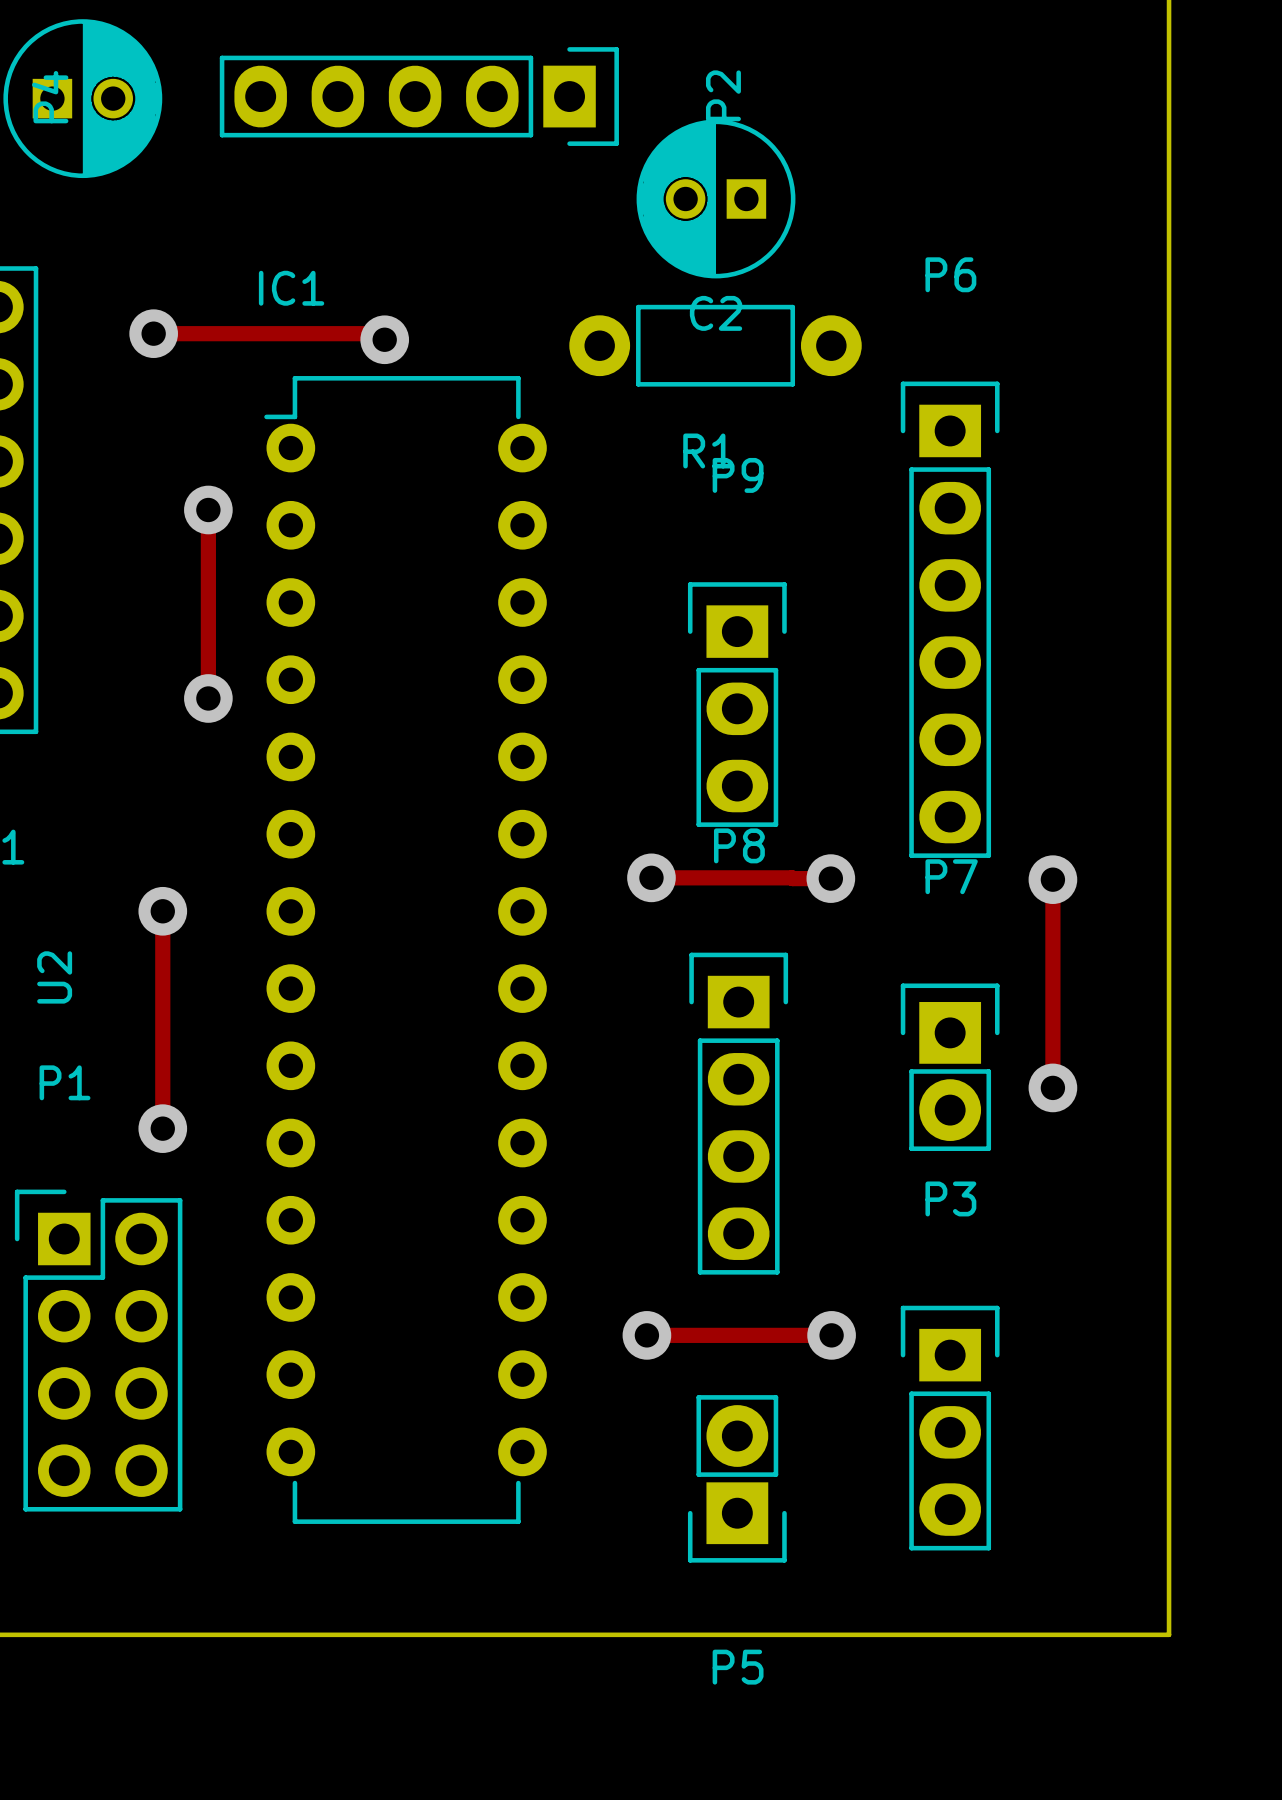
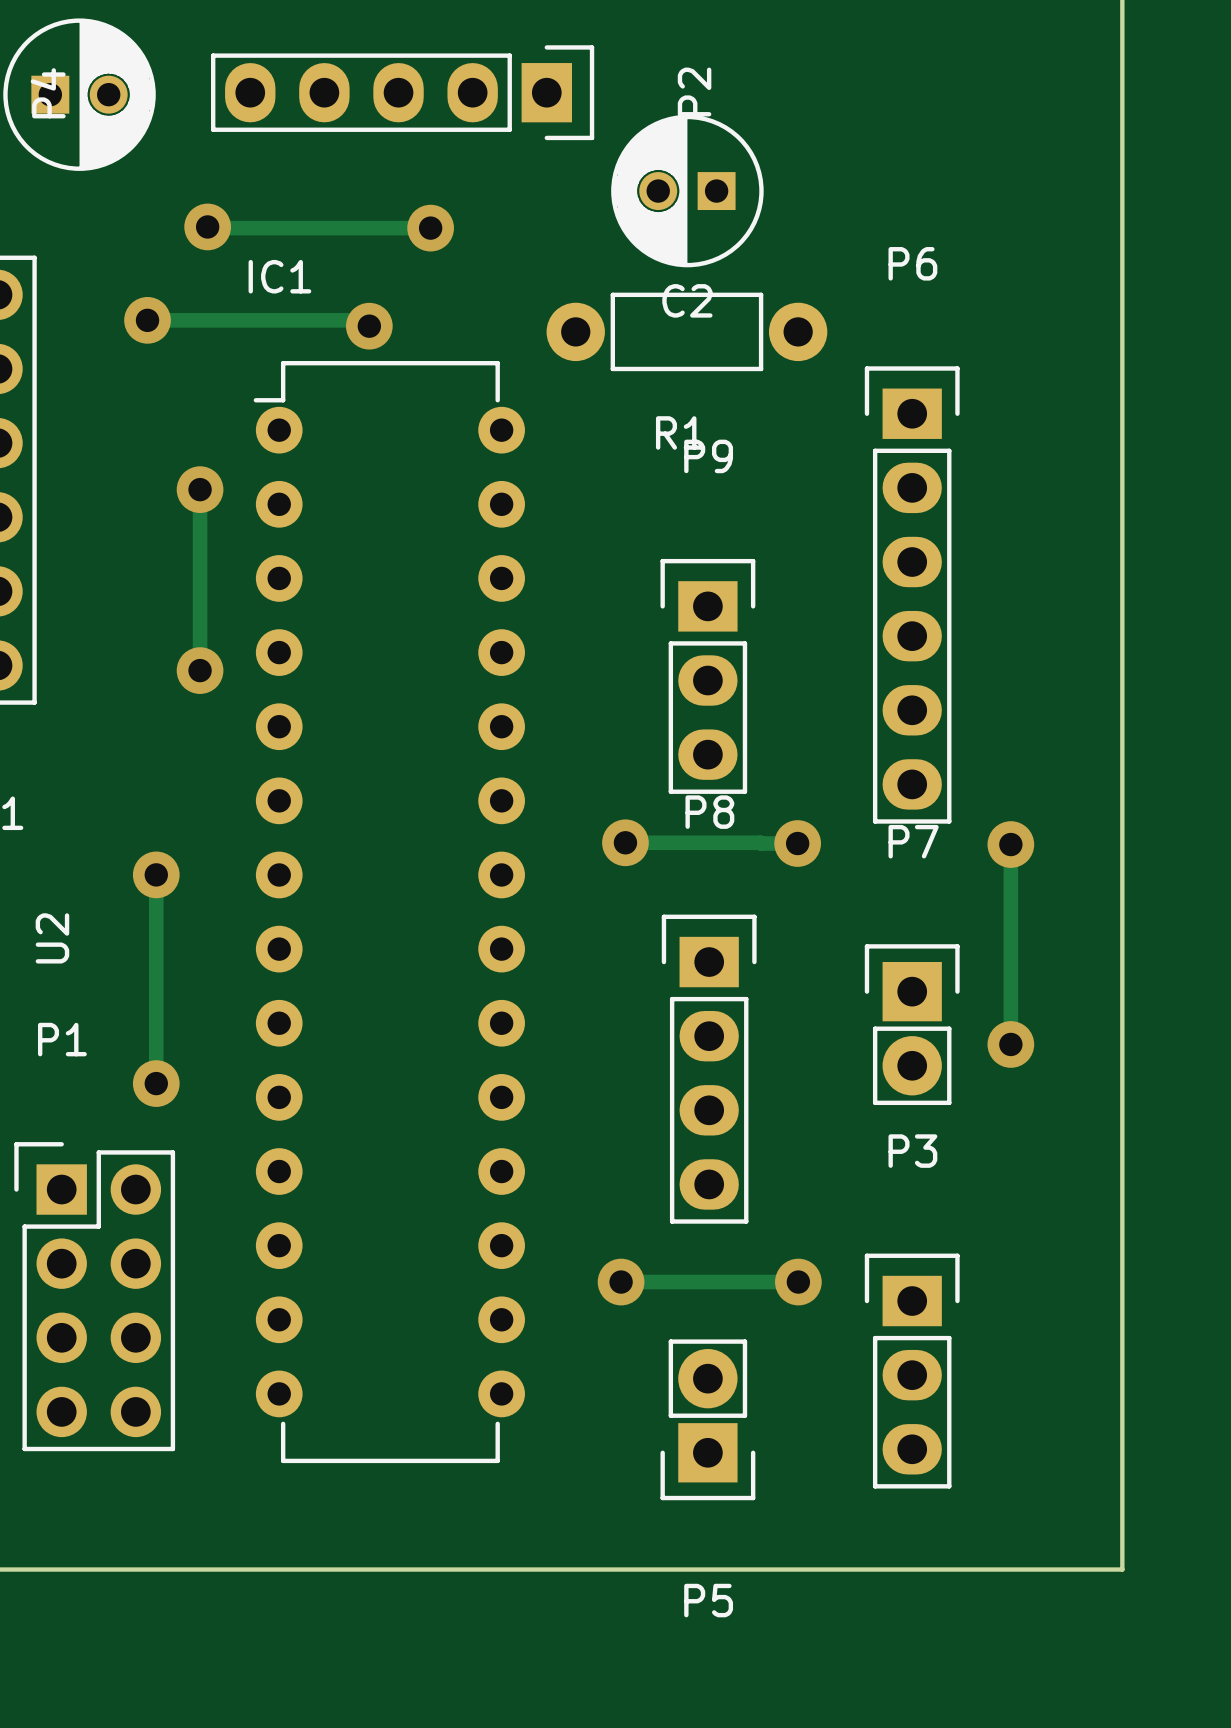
track: none -> (207, 226) (430, 228)
via: none -> (207, 226)
via: none -> (430, 228)

